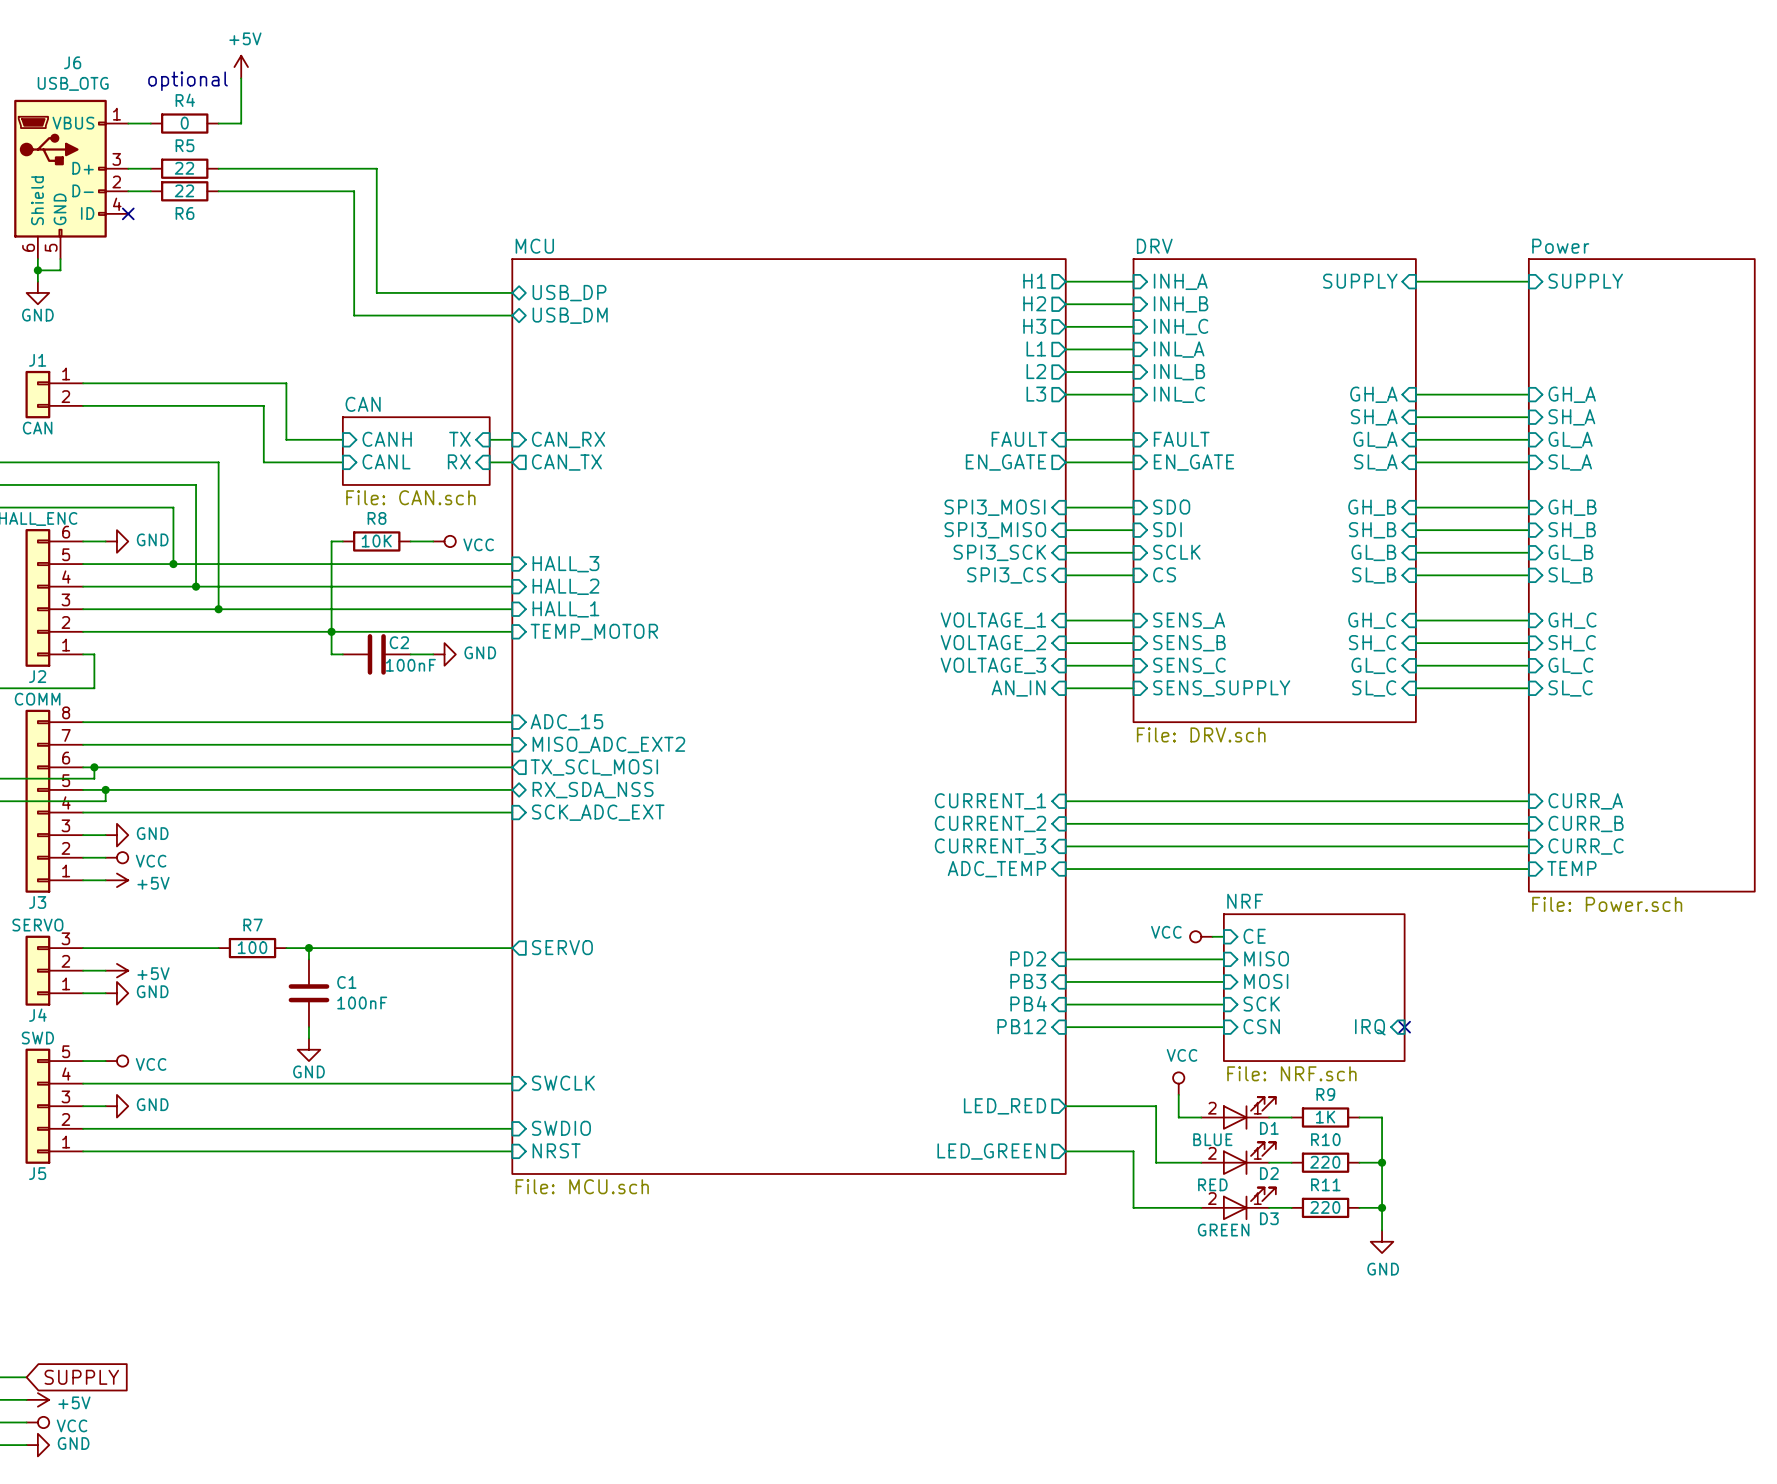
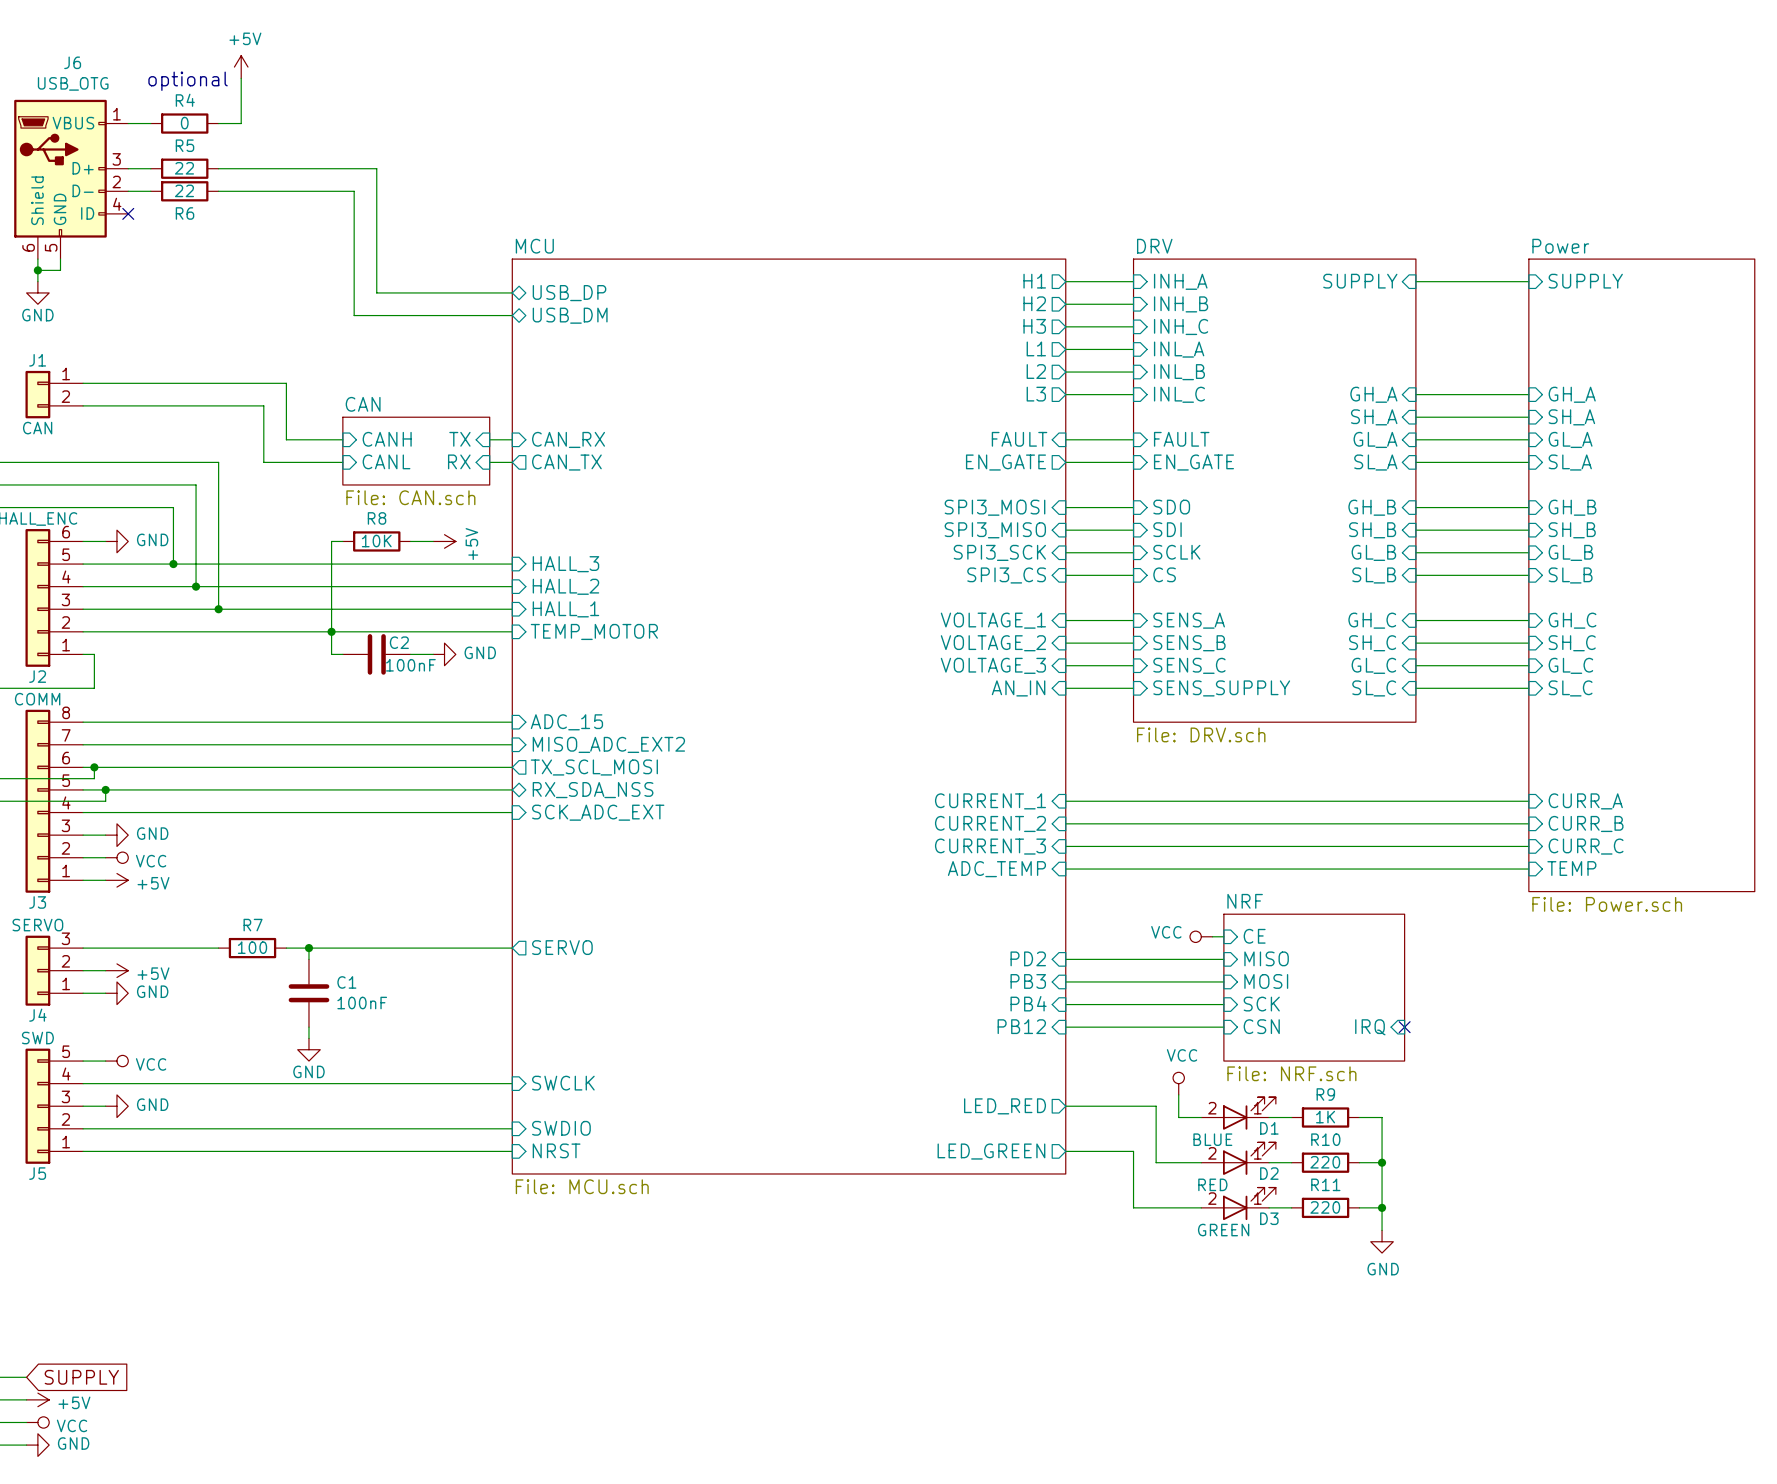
power symbol: VCC (444, 541) -> +5V (444, 541)

